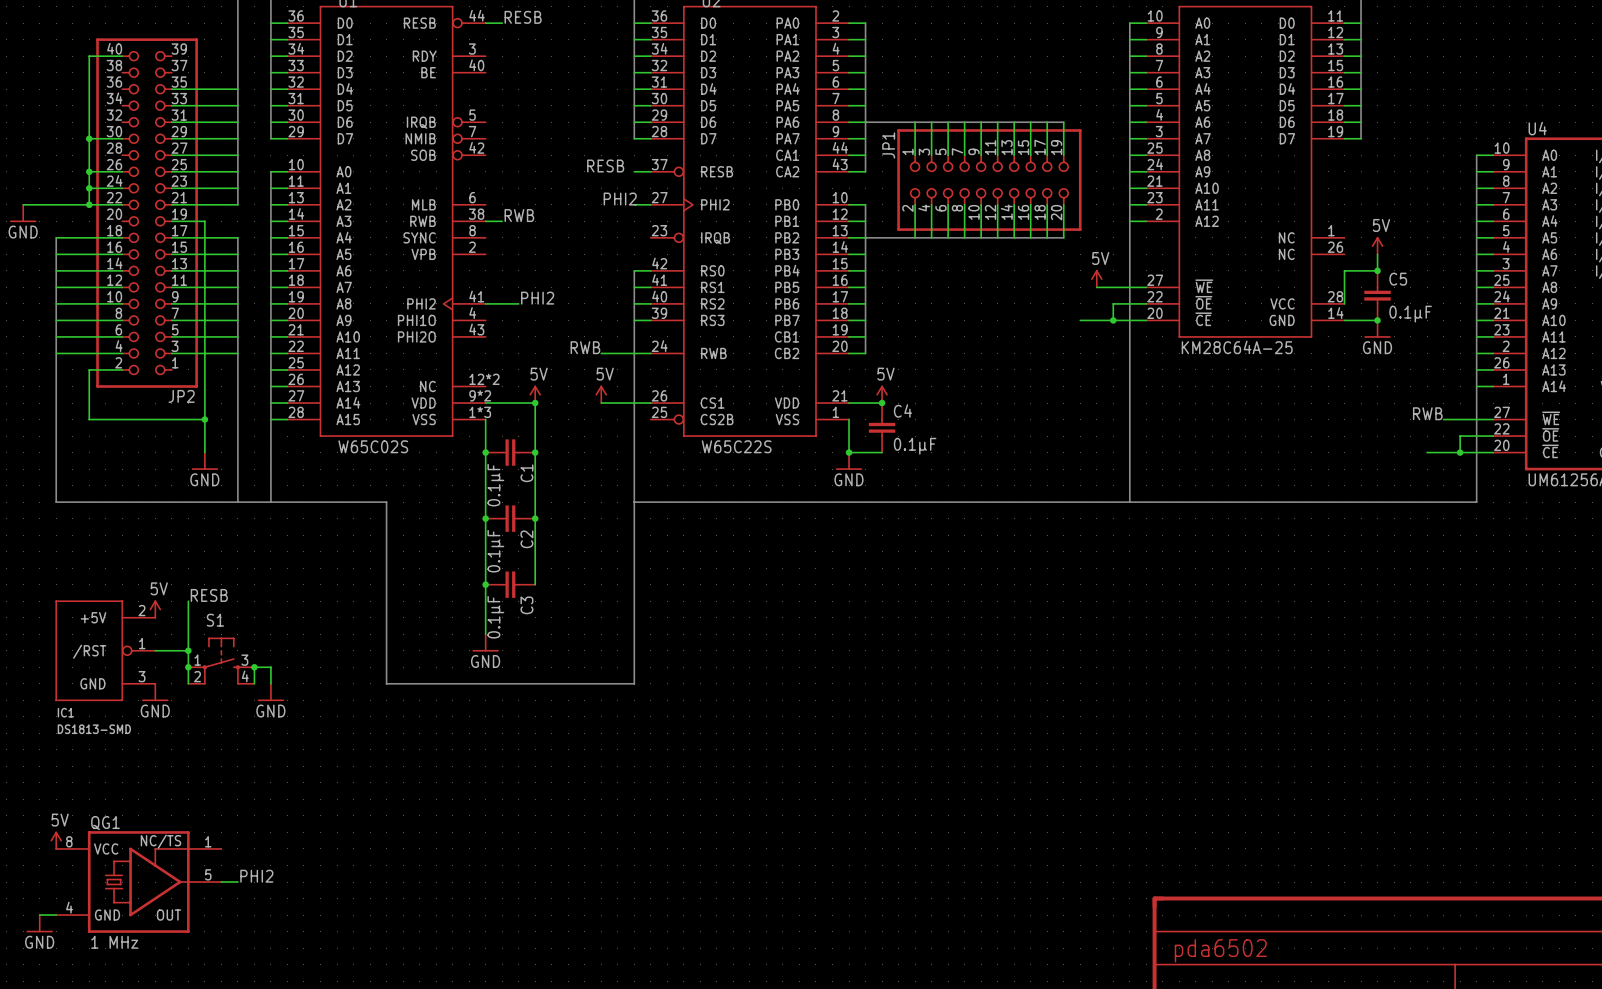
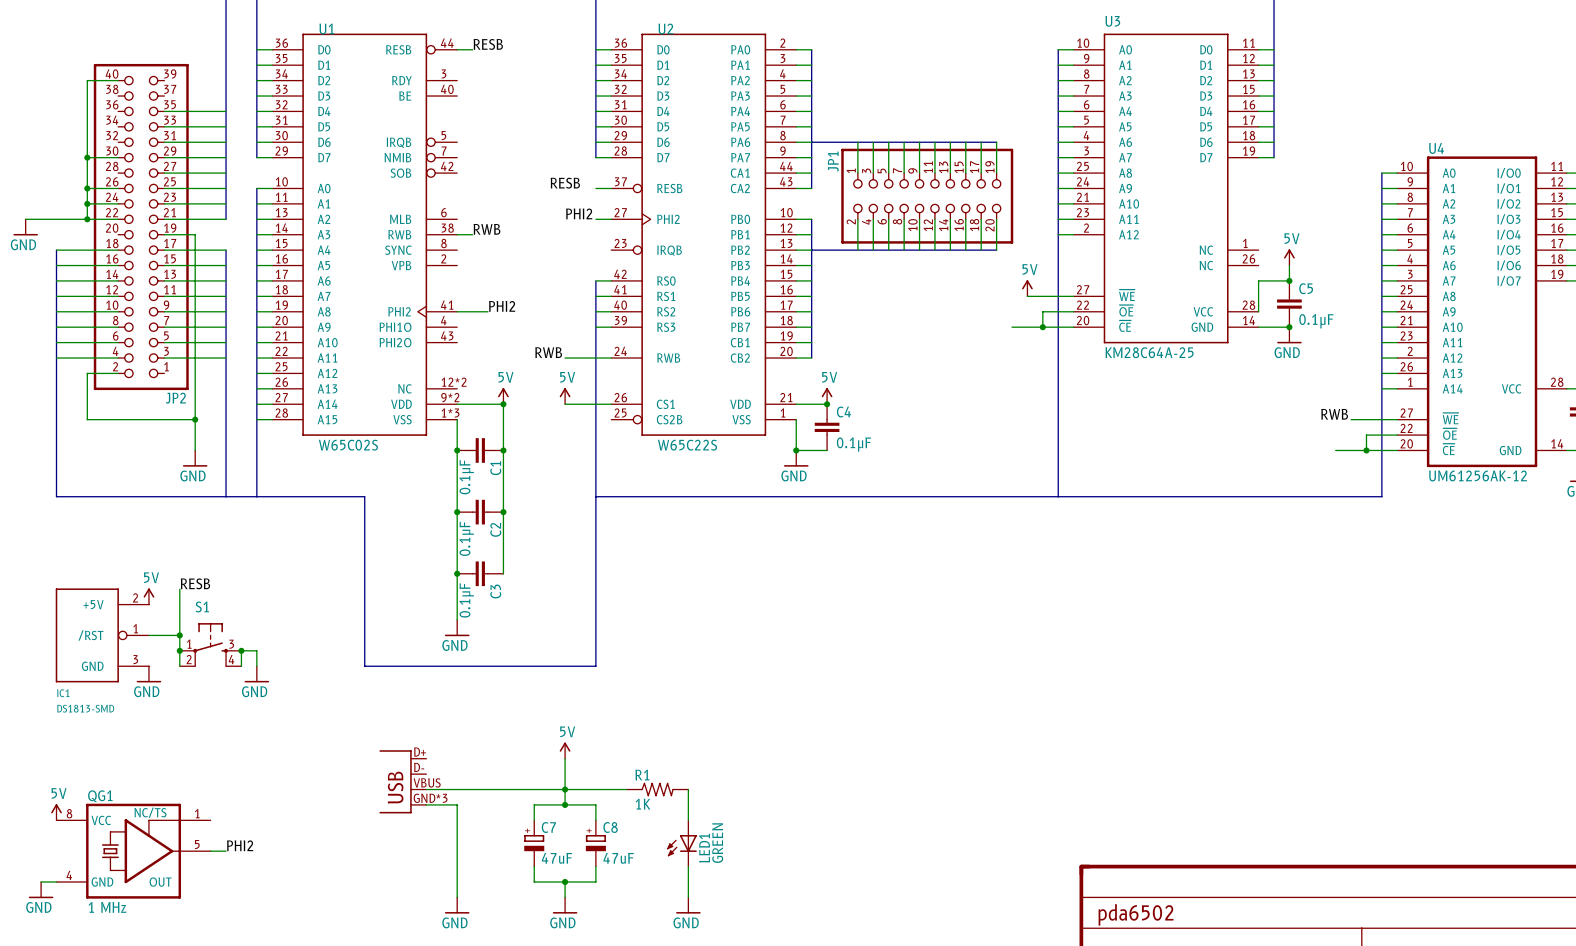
power symbol: none -> 5V (565, 750)
wire: none -> (565, 758) (565, 804)
part: none -> (402, 781)
wire: none -> (426, 789) (626, 789)
junction: none -> (565, 789)
R1: none -> 1K (657, 789)
wire: none -> (688, 789) (688, 820)
wire: none -> (426, 804) (457, 804) (457, 897)
junction: none -> (565, 804)
wire: none -> (534, 820) (534, 804) (595, 804) (595, 820)
C7: none -> 47uF (534, 843)
C8: none -> 47uF (595, 843)
LED1: none -> GREEN (681, 843)
wire: none -> (534, 866) (534, 882) (595, 882) (595, 866)
wire: none -> (688, 866) (688, 897)
wire: none -> (565, 882) (565, 897)
junction: none -> (565, 882)
power symbol: none -> GND (457, 905)
power symbol: none -> GND (565, 905)
power symbol: none -> GND (688, 905)

